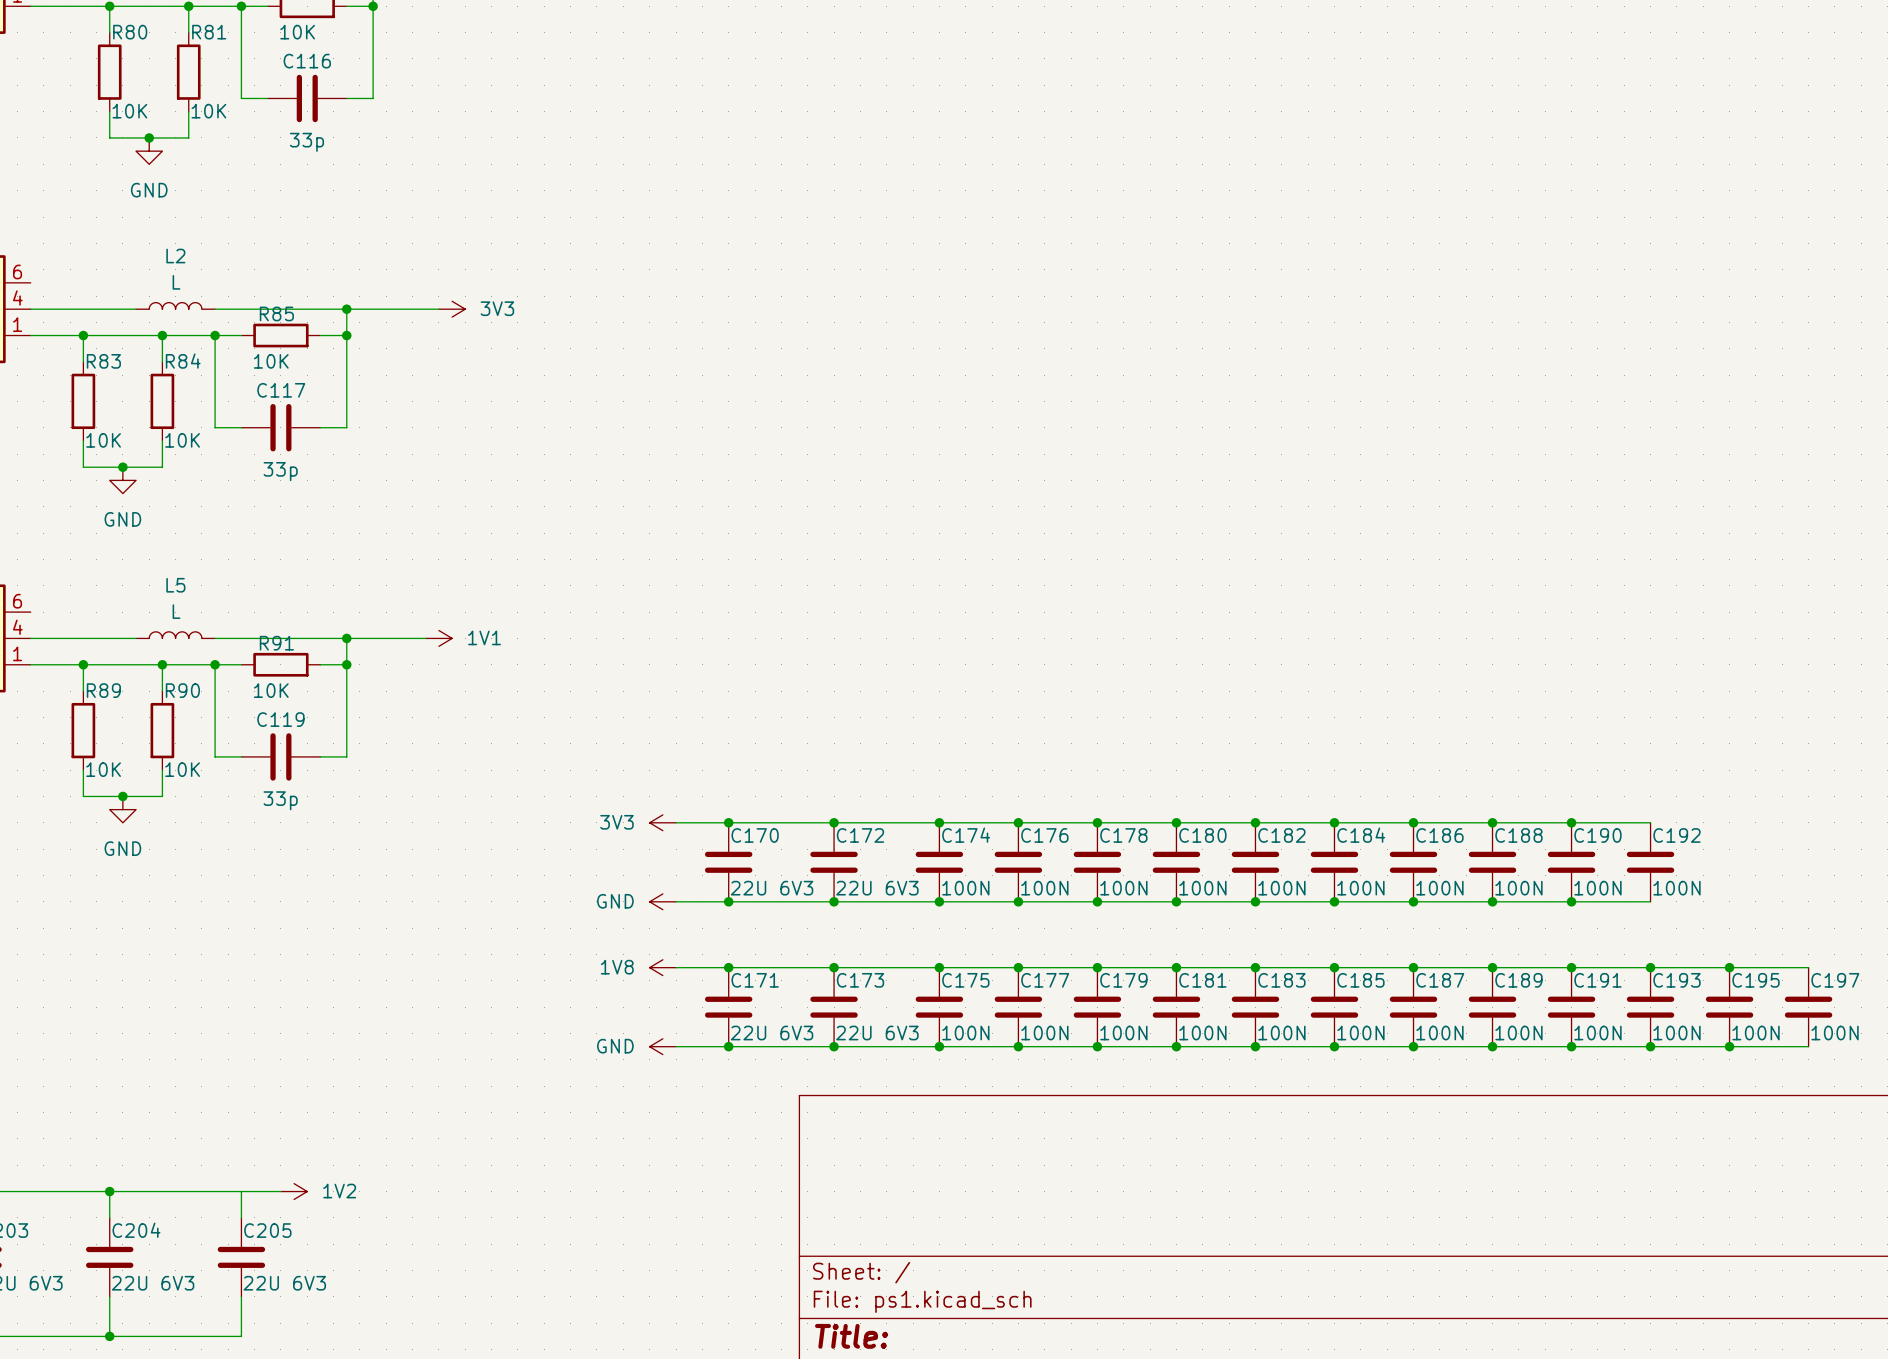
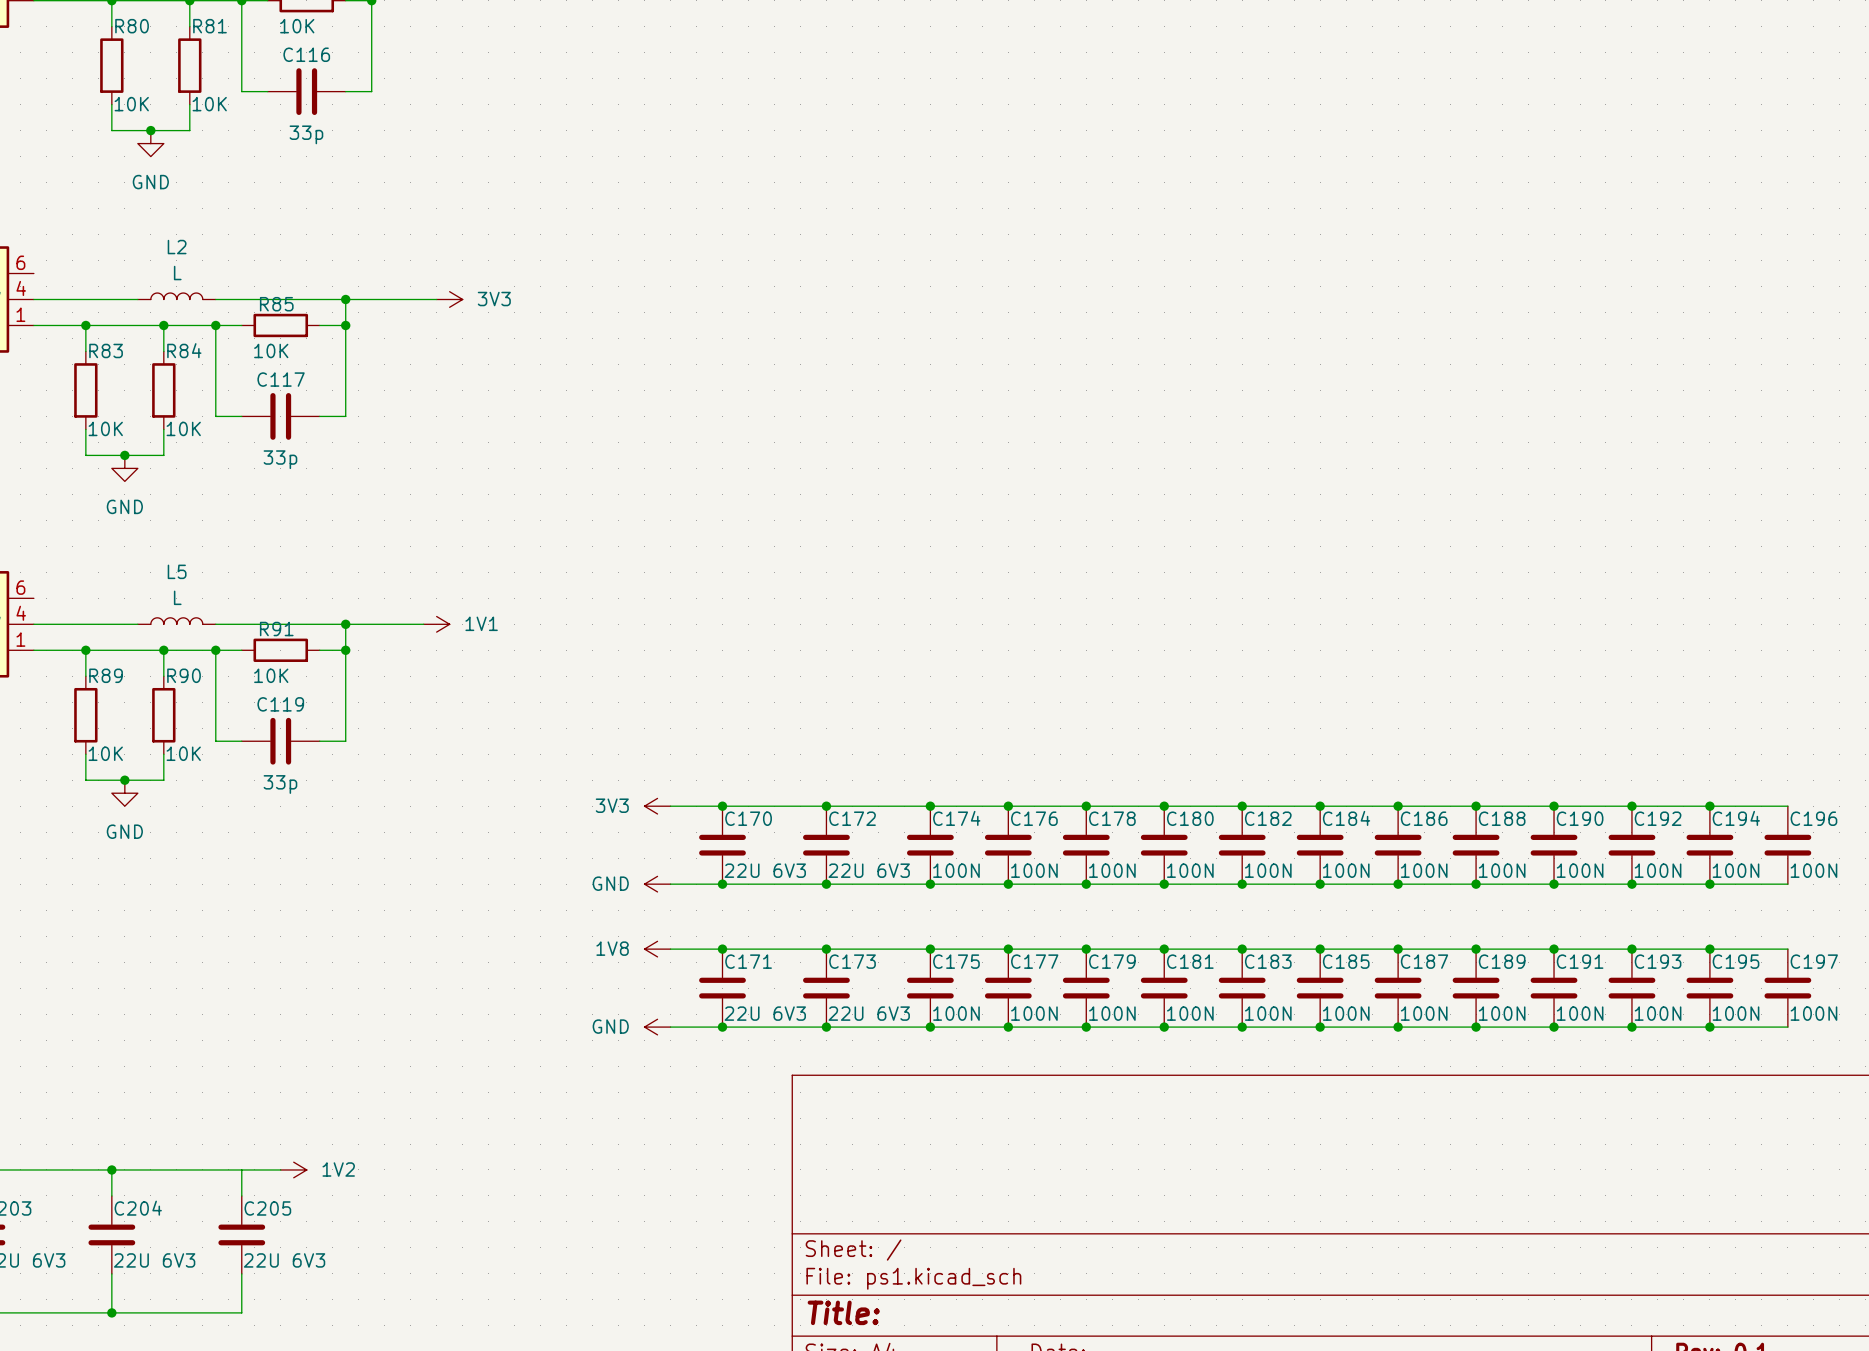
wire: none -> (1631, 806) (1787, 806)
junction: none -> (1631, 806)
junction: none -> (1709, 806)
C194: none -> 100N (1709, 845)
C196: none -> 100N (1787, 845)
wire: none -> (1631, 884) (1787, 884)
junction: none -> (1631, 884)
junction: none -> (1709, 884)

